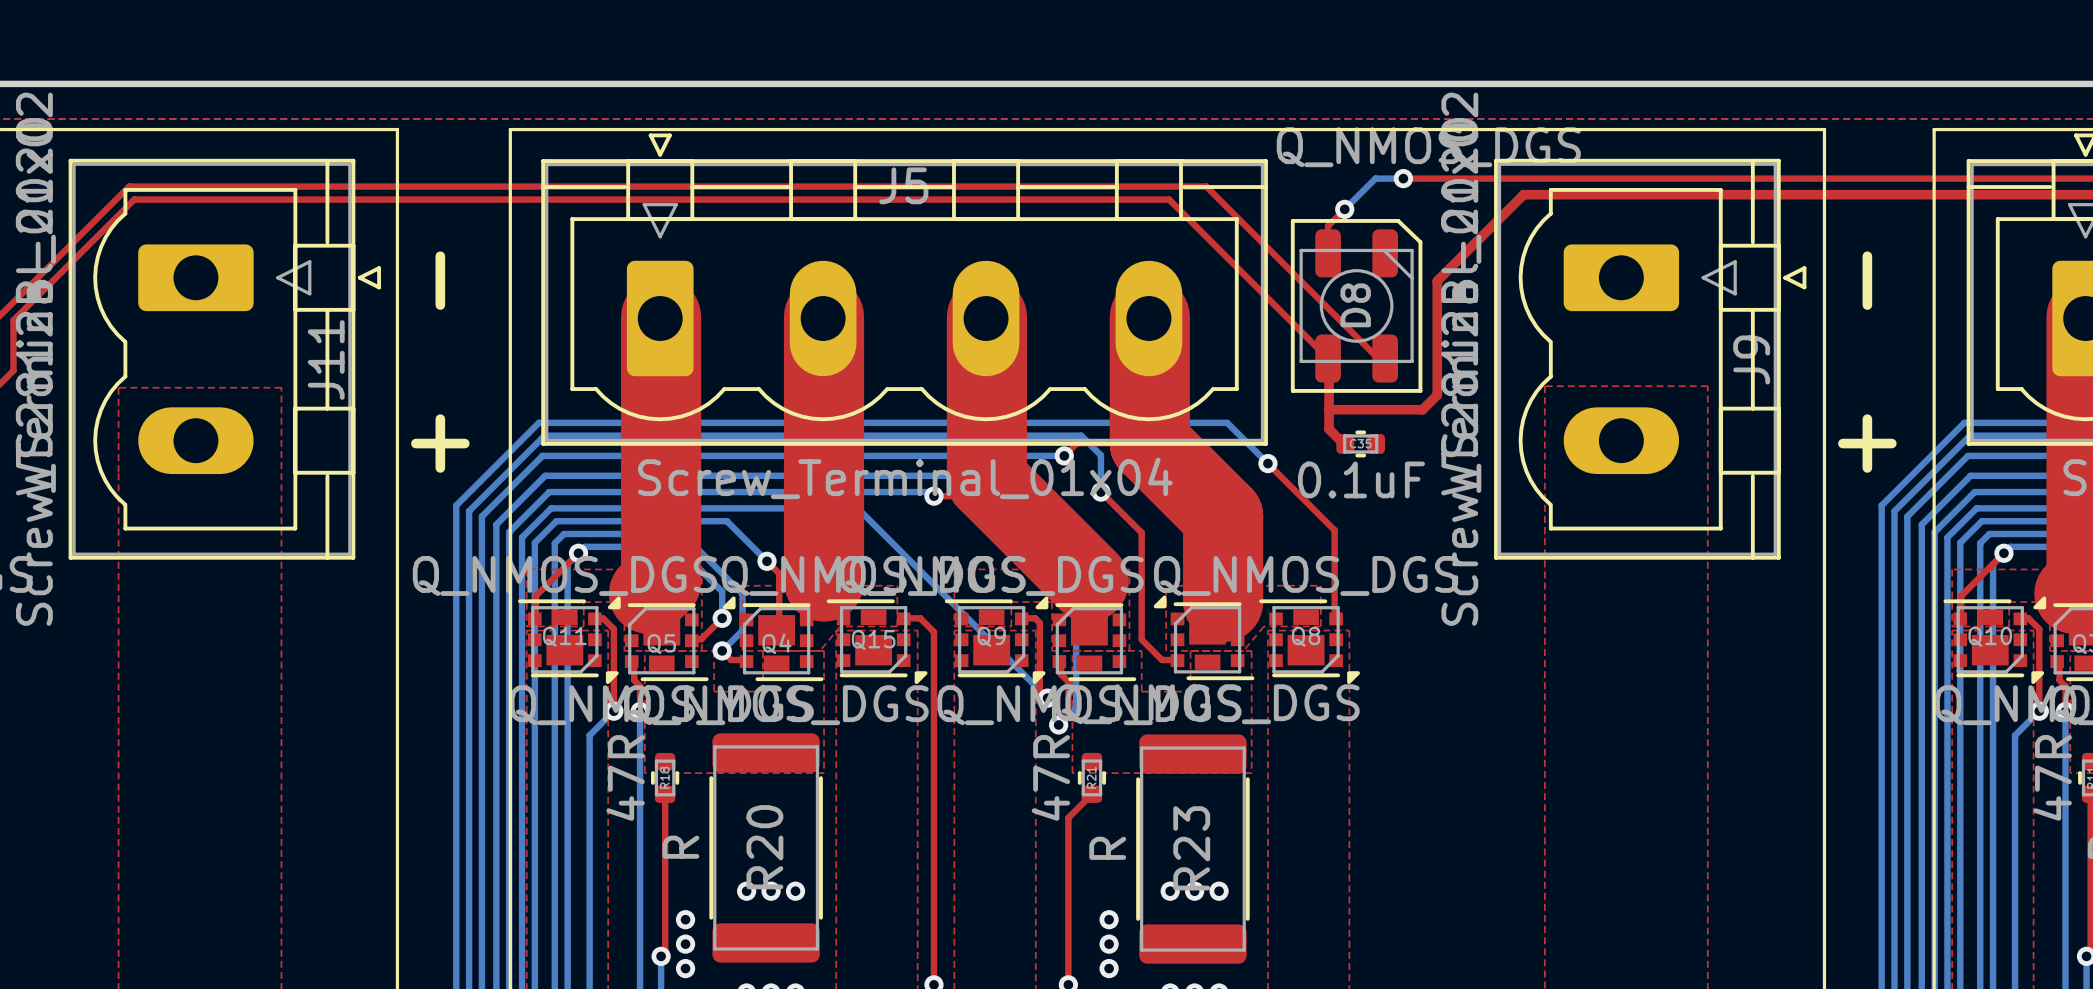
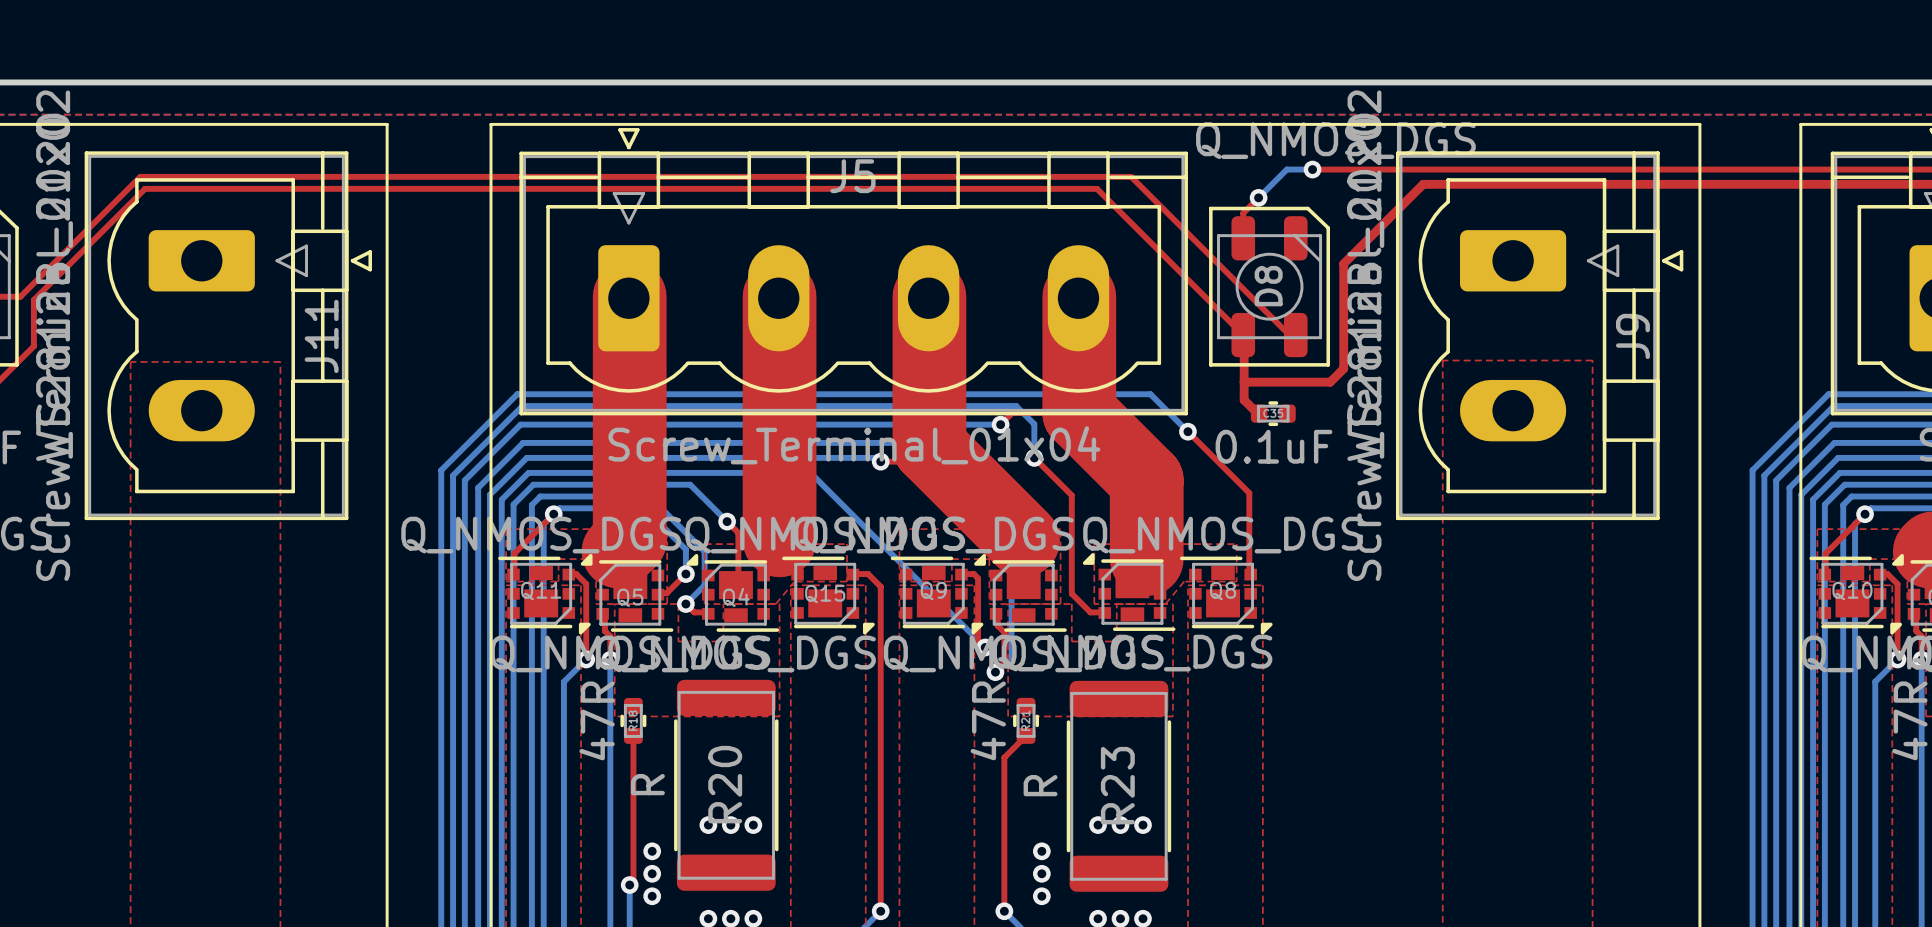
text: - (440, 280) -> none
text: - (1867, 280) -> none
text: + (440, 443) -> none
text: + (1867, 443) -> none

